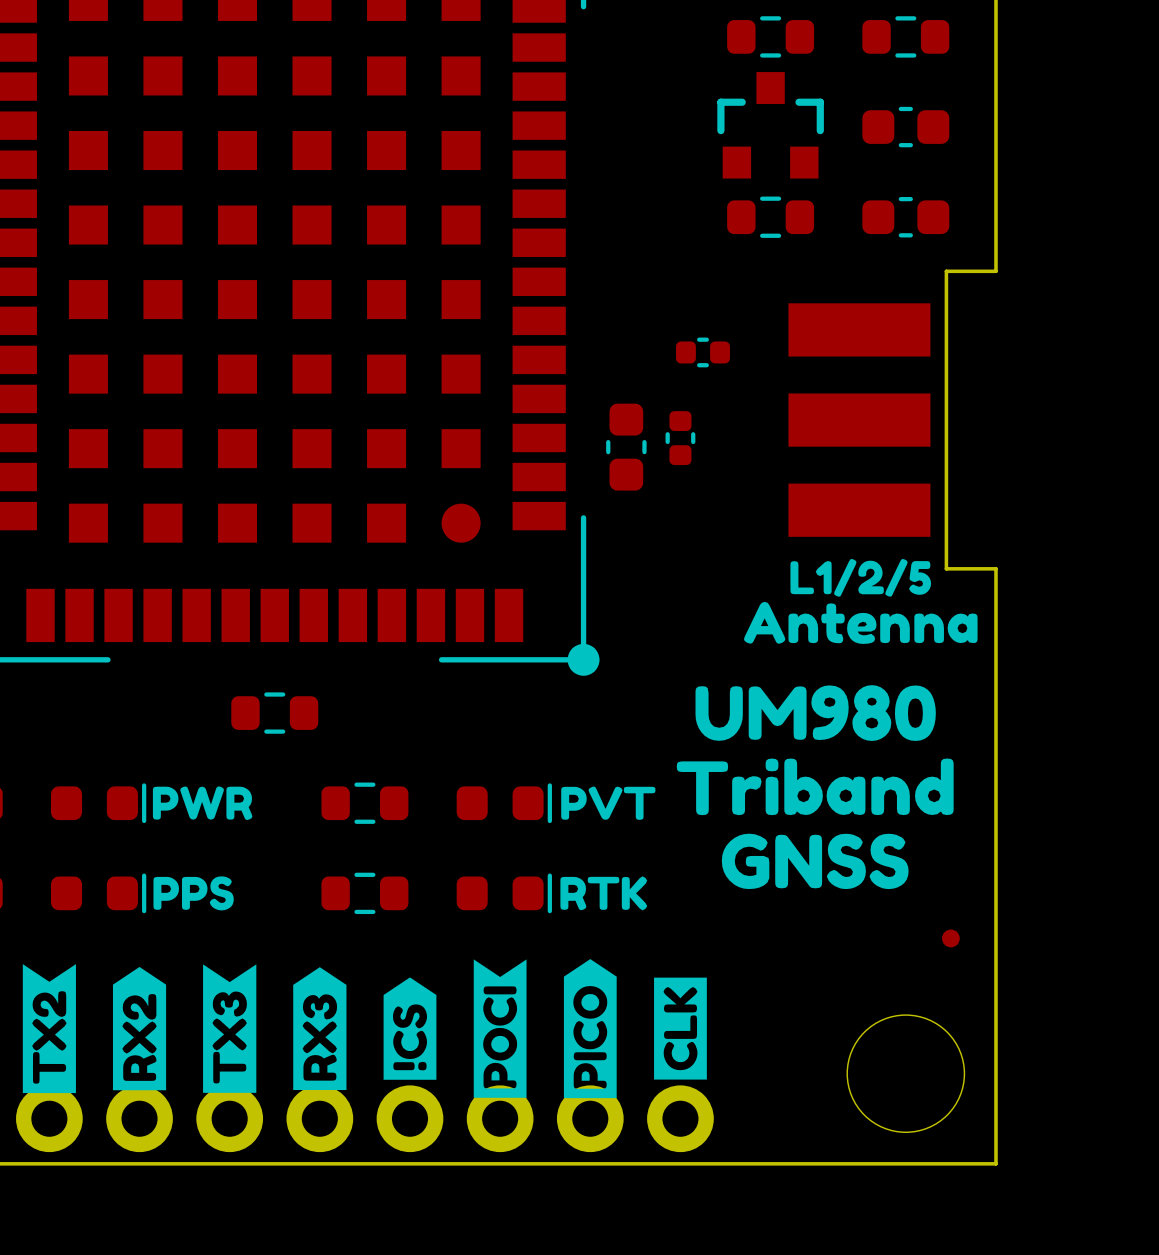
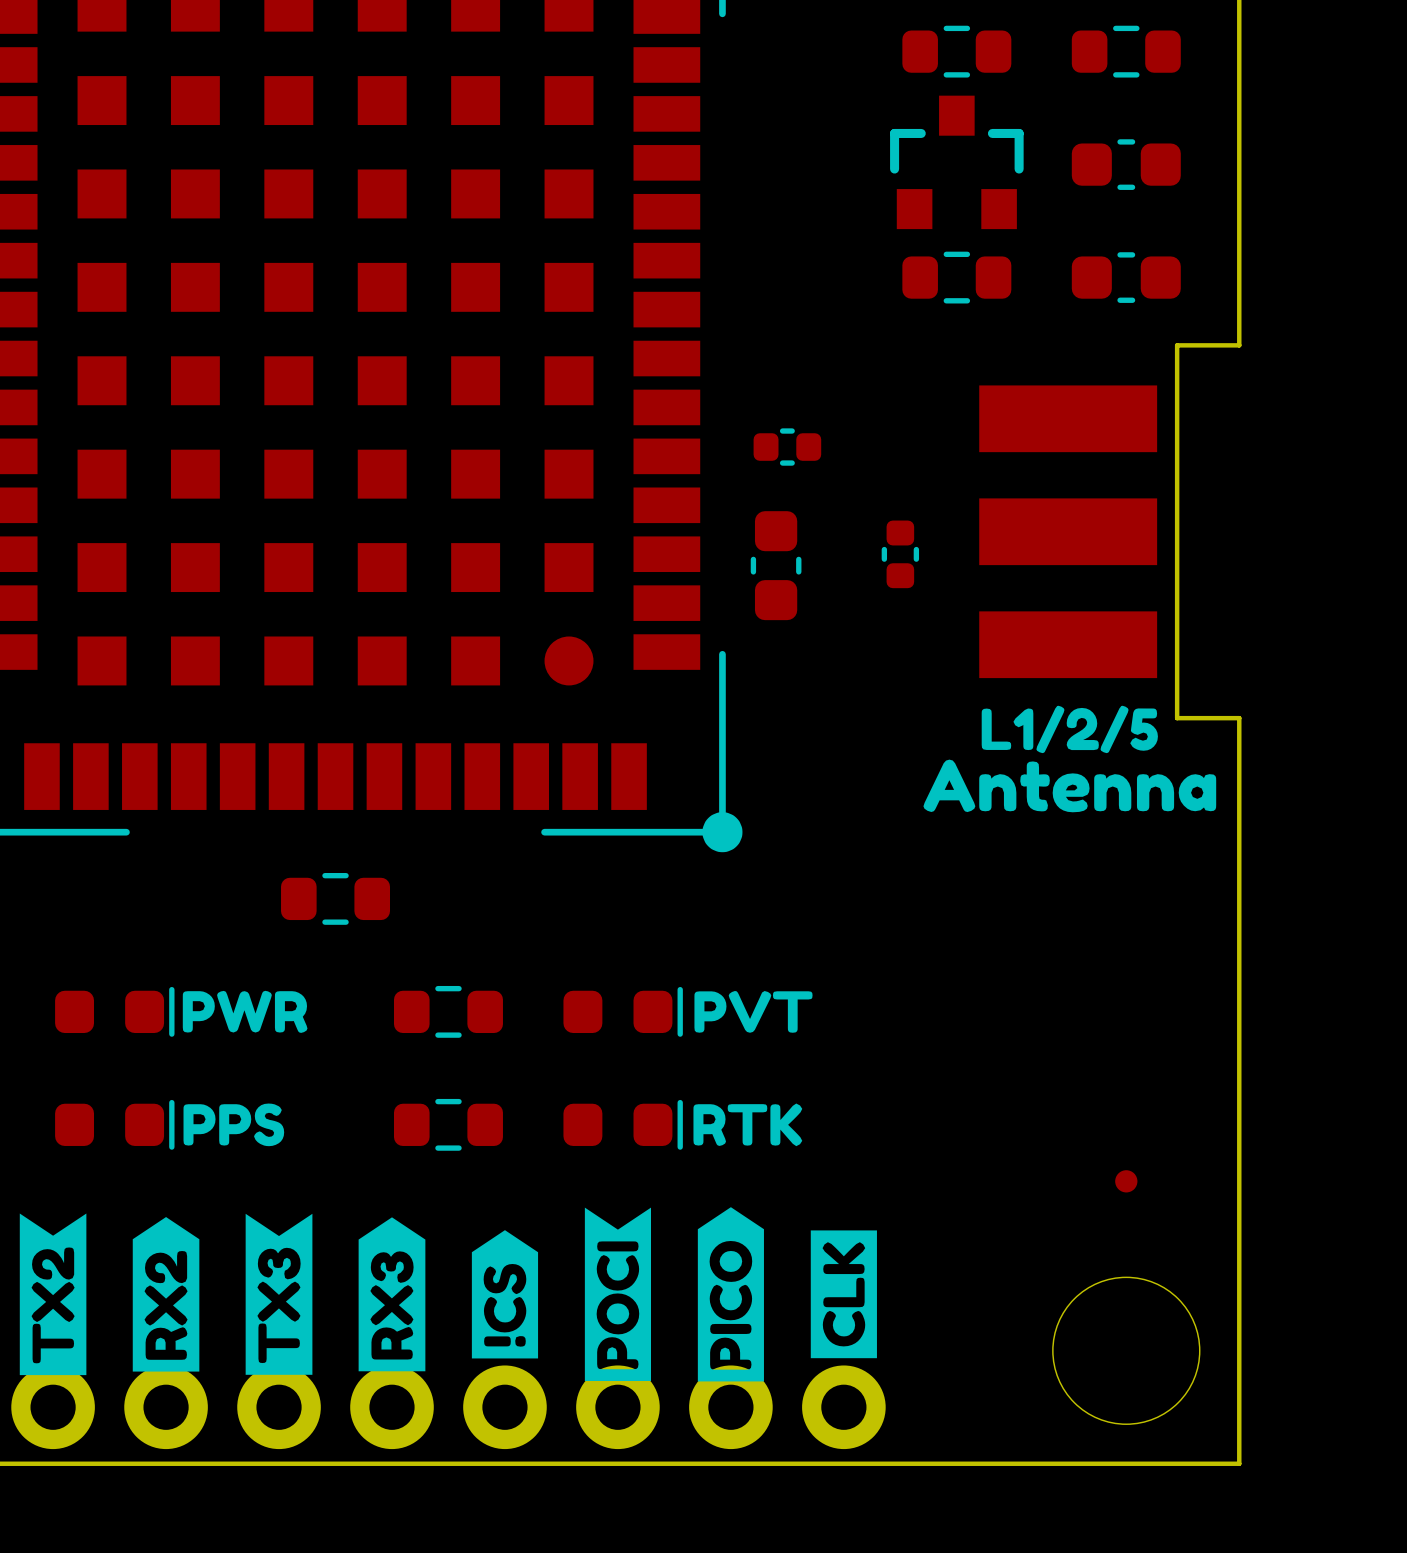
part: none -> (787, 447)
part: (702, 352) -> none
part: (680, 438) -> none
part: none -> (900, 554)
drawing: [676, 685, 954, 890] -> none
part position: (950, 938) -> (1126, 1181)

